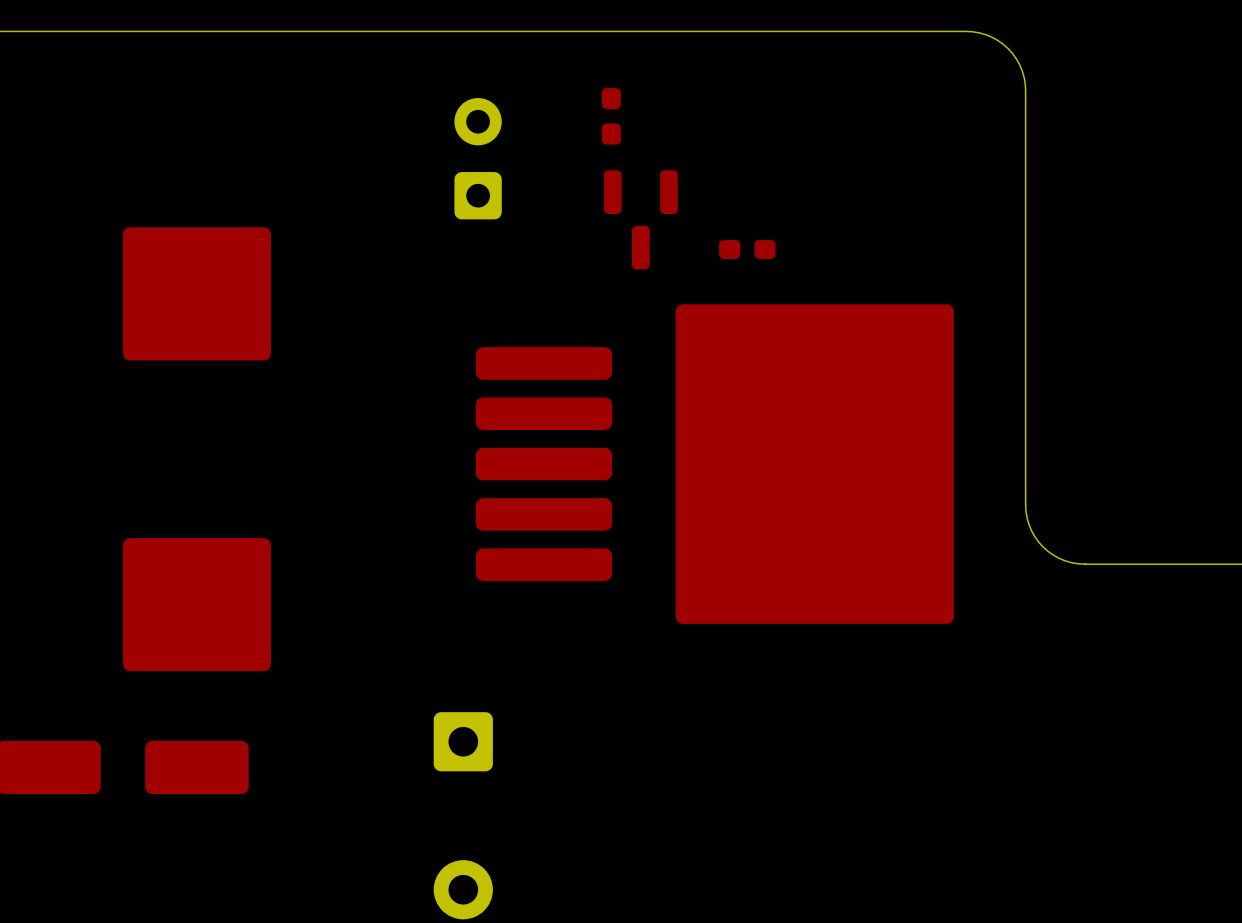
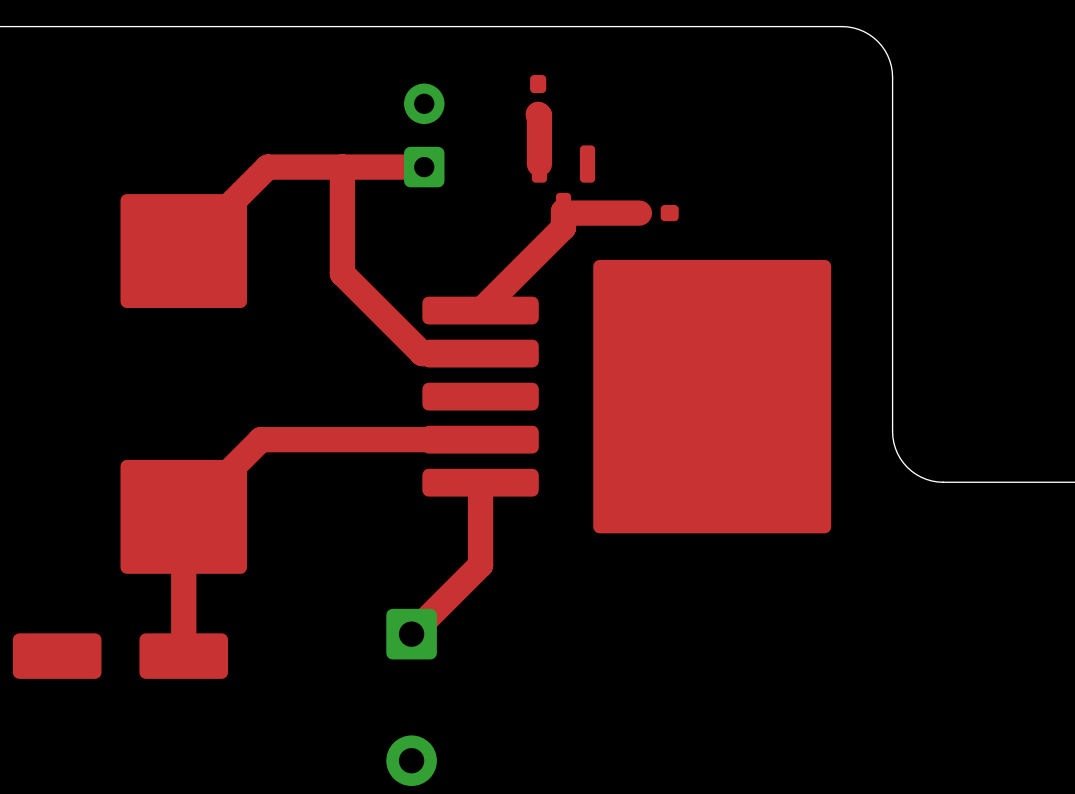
top track: none -> (538, 114) (539, 164)
top track: none -> (342, 167) (342, 273) (422, 353) (480, 353)
top track: none -> (424, 167) (267, 167) (183, 251)
top track: none -> (639, 213) (565, 213) (563, 211) (563, 227) (480, 310)
top track: none -> (480, 439) (260, 439) (183, 516) (183, 656)
top track: none -> (480, 482) (480, 565) (411, 634)

